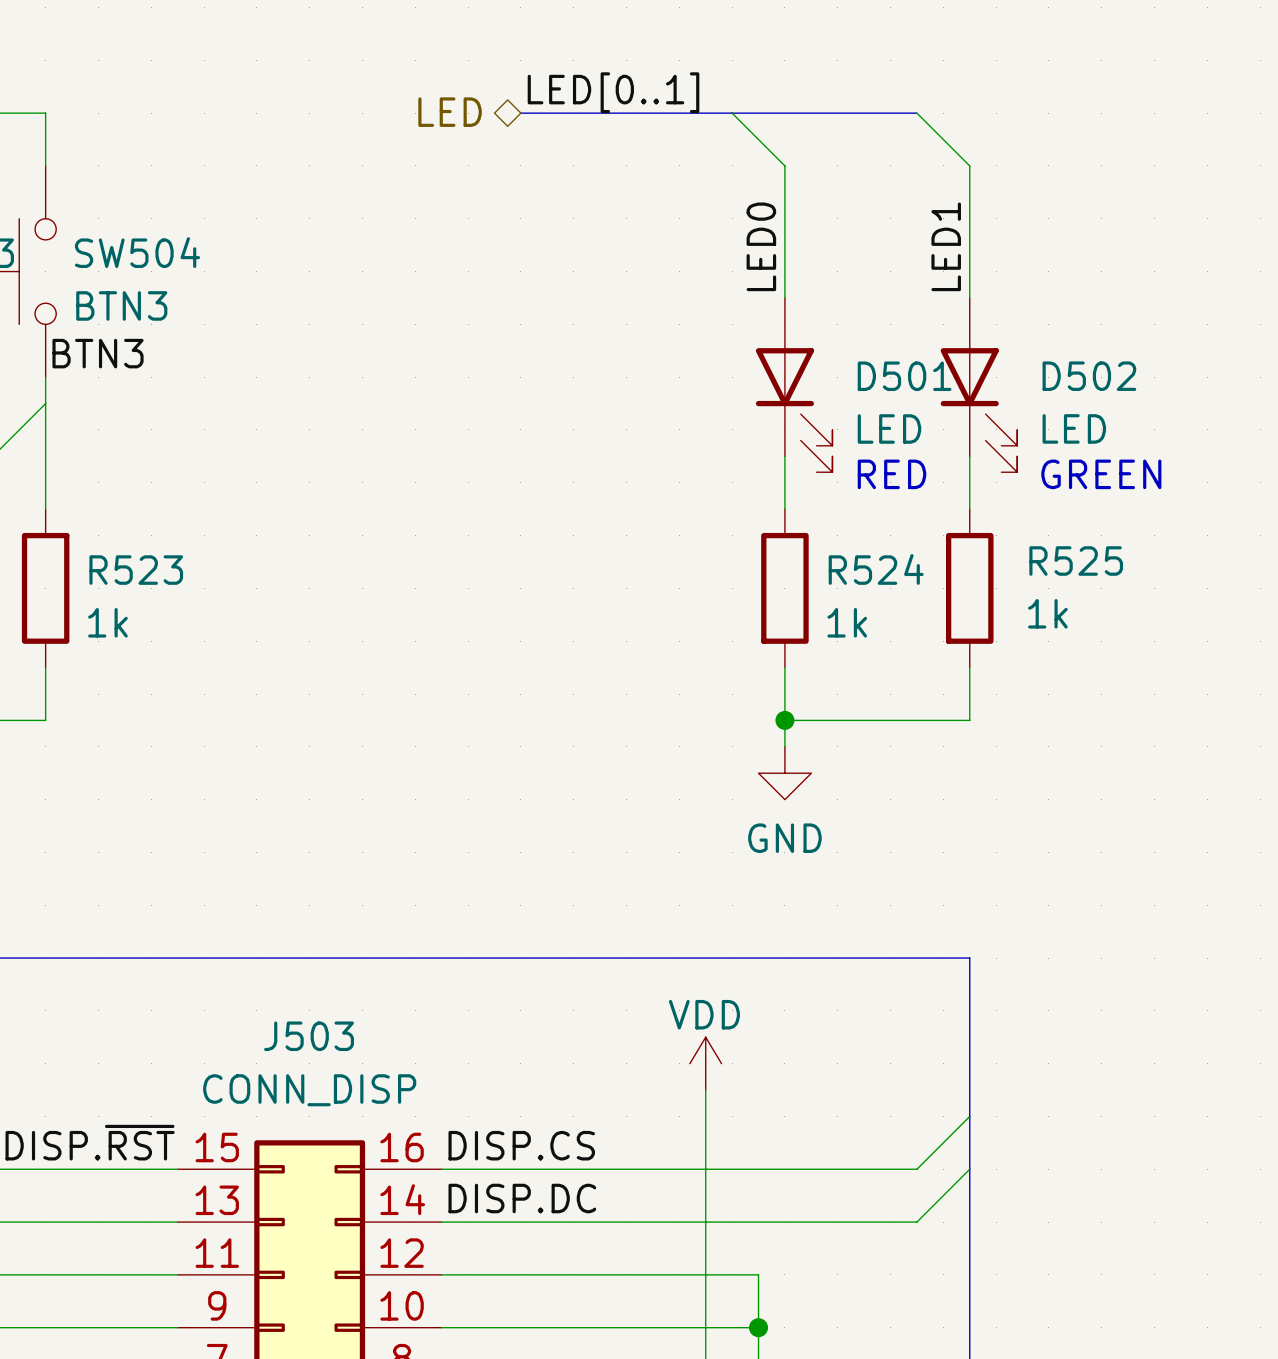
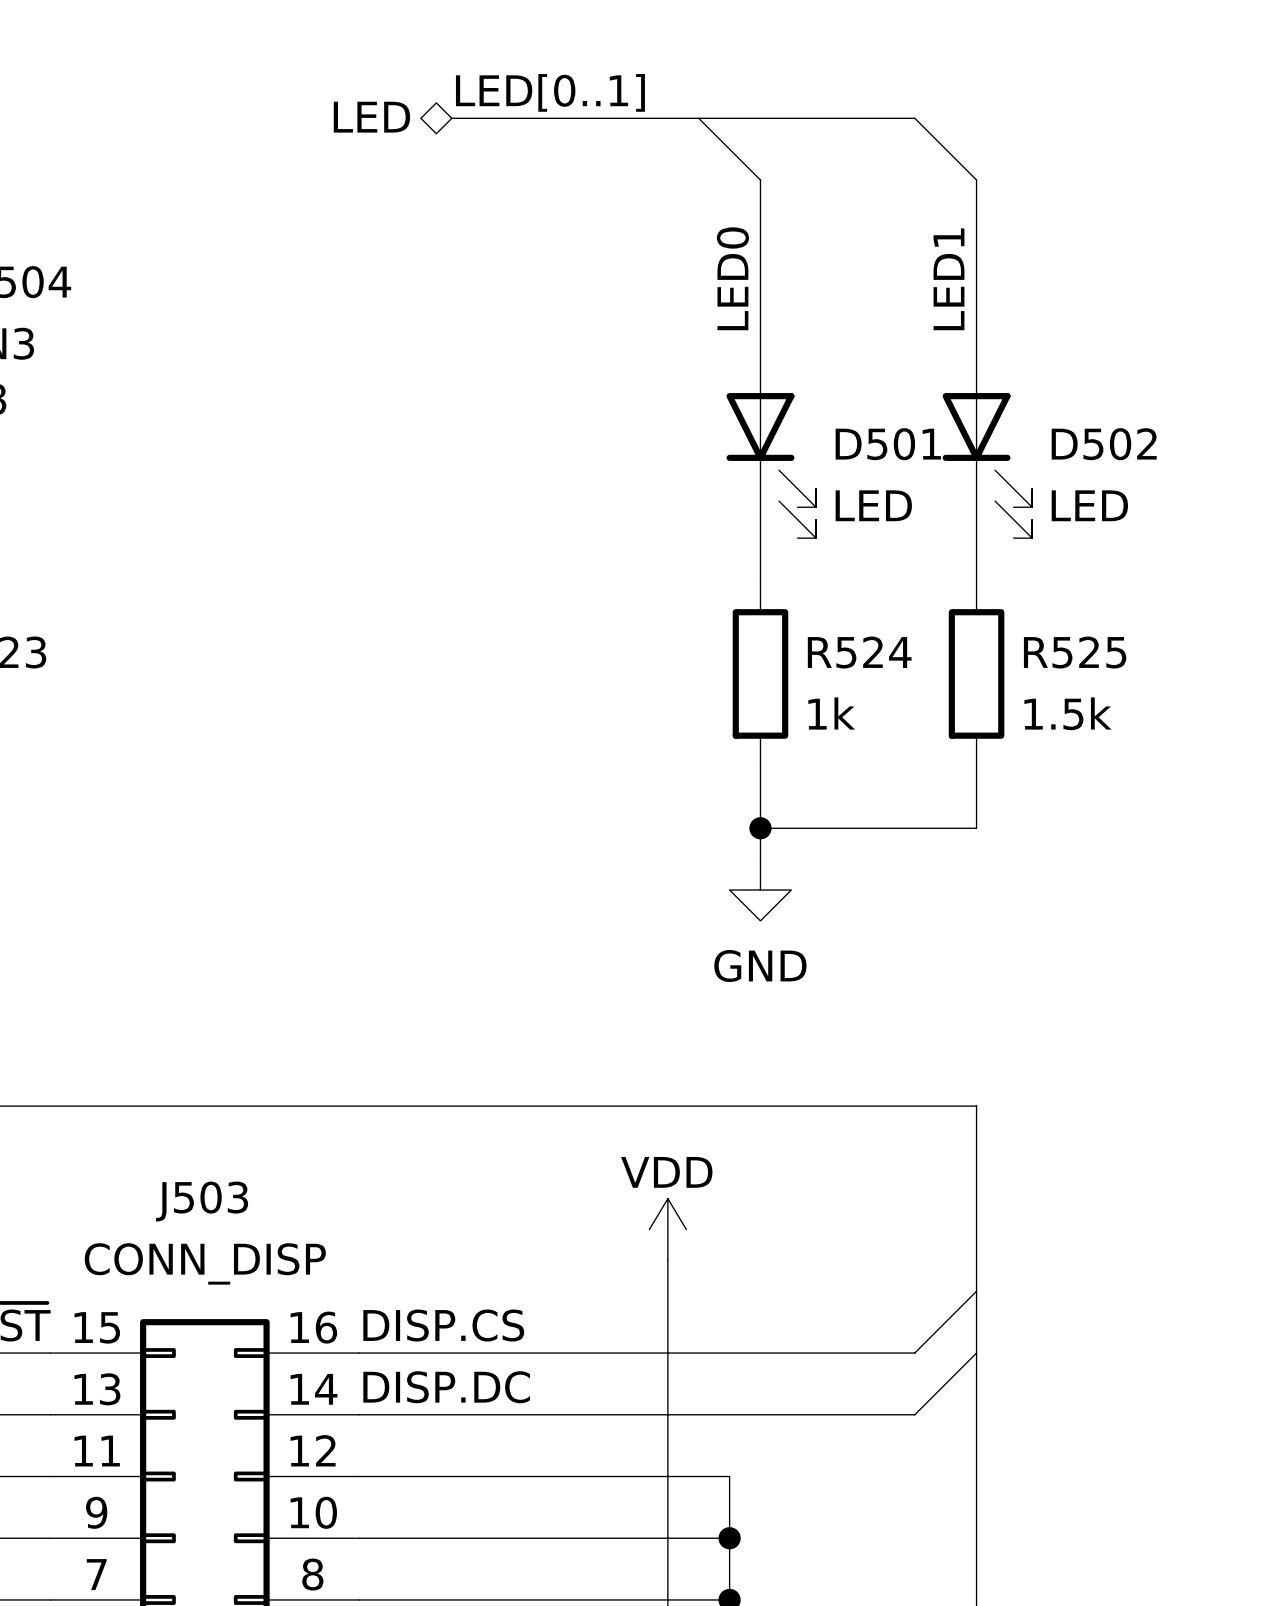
D501 name position: D501 (904, 376) -> D501 (888, 444)
D502 name position: D502 (1089, 376) -> D502 (1104, 444)
D501 value position: LED (889, 428) -> LED (873, 505)
D502 value position: LED (1074, 428) -> LED (1089, 505)
text: RED (892, 474) -> none
text: GREEN (1101, 474) -> none
R525 name position: R525 (1076, 561) -> R525 (1075, 652)
R525 value: 1k (1047, 613) -> 1.5k (1067, 713)

